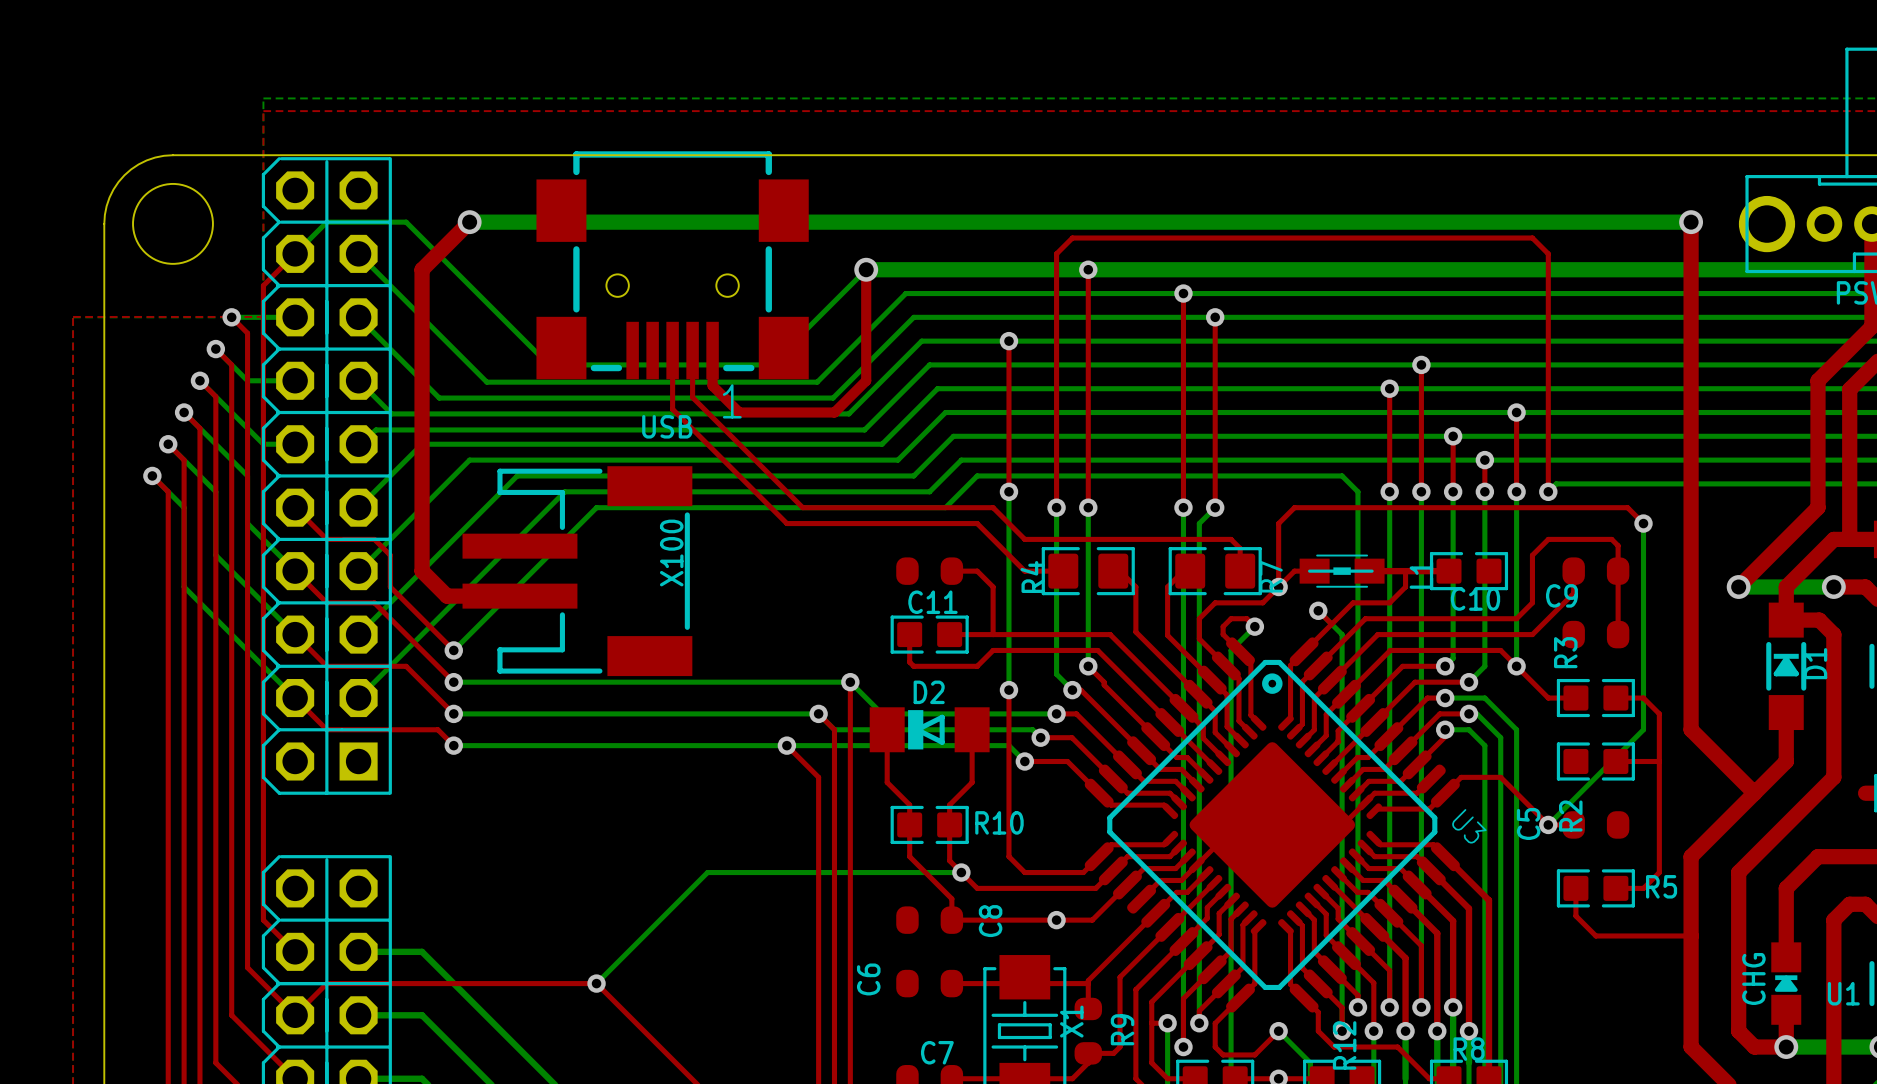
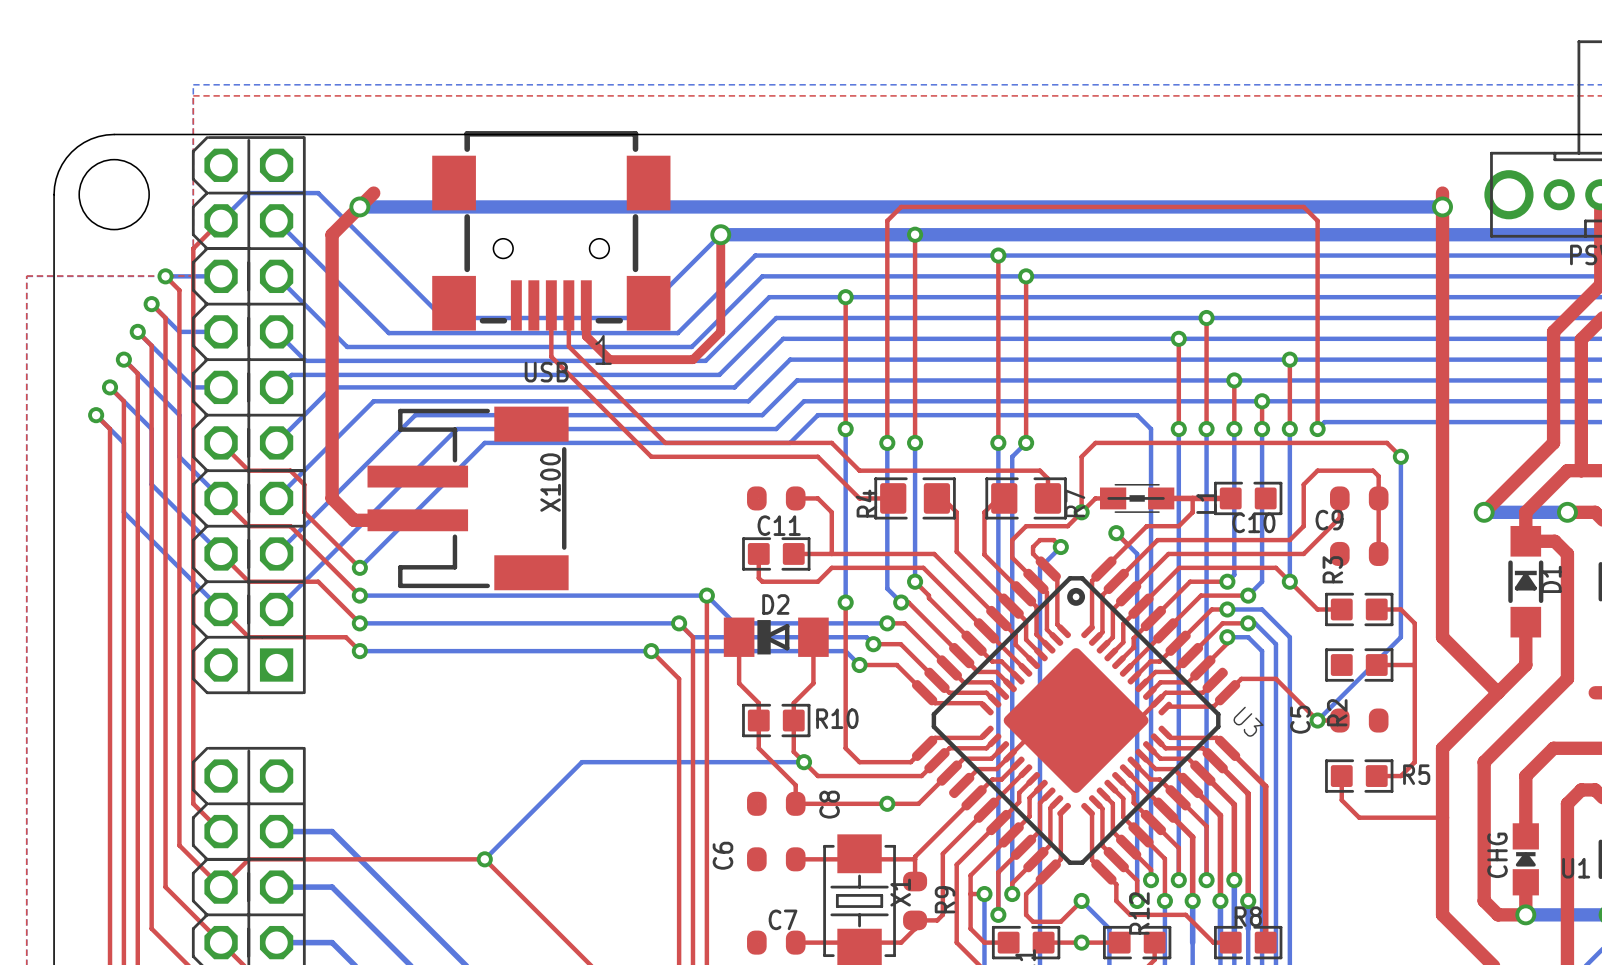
bottom track: (469, 222) (1691, 222) -> none
via position: (469, 222) -> (359, 206)
via position: (1691, 222) -> (1442, 206)
bottom track: none -> (359, 206) (1442, 206)

